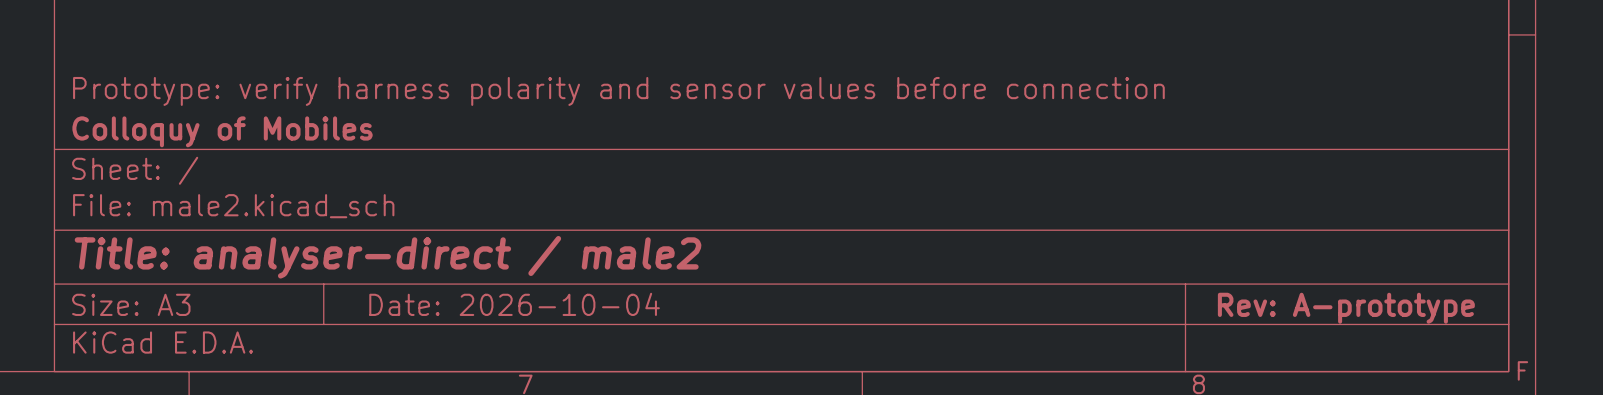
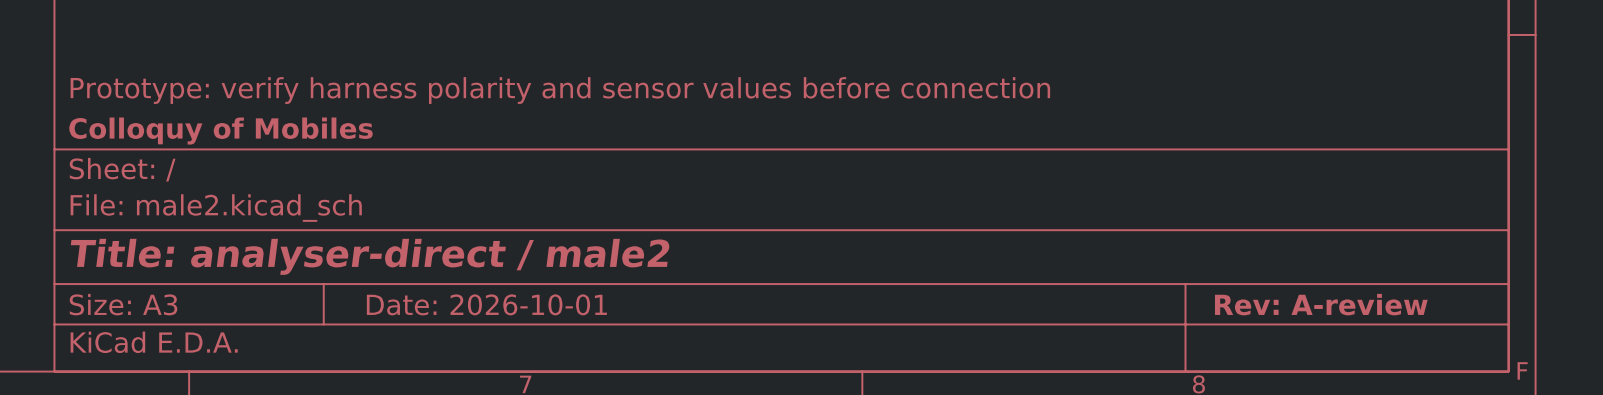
title block: Date: 2026-10-04 (514, 304) -> Date: 2026-10-01 (486, 304)
title block: Rev: A-prototype (1346, 308) -> Rev: A-review (1321, 304)

